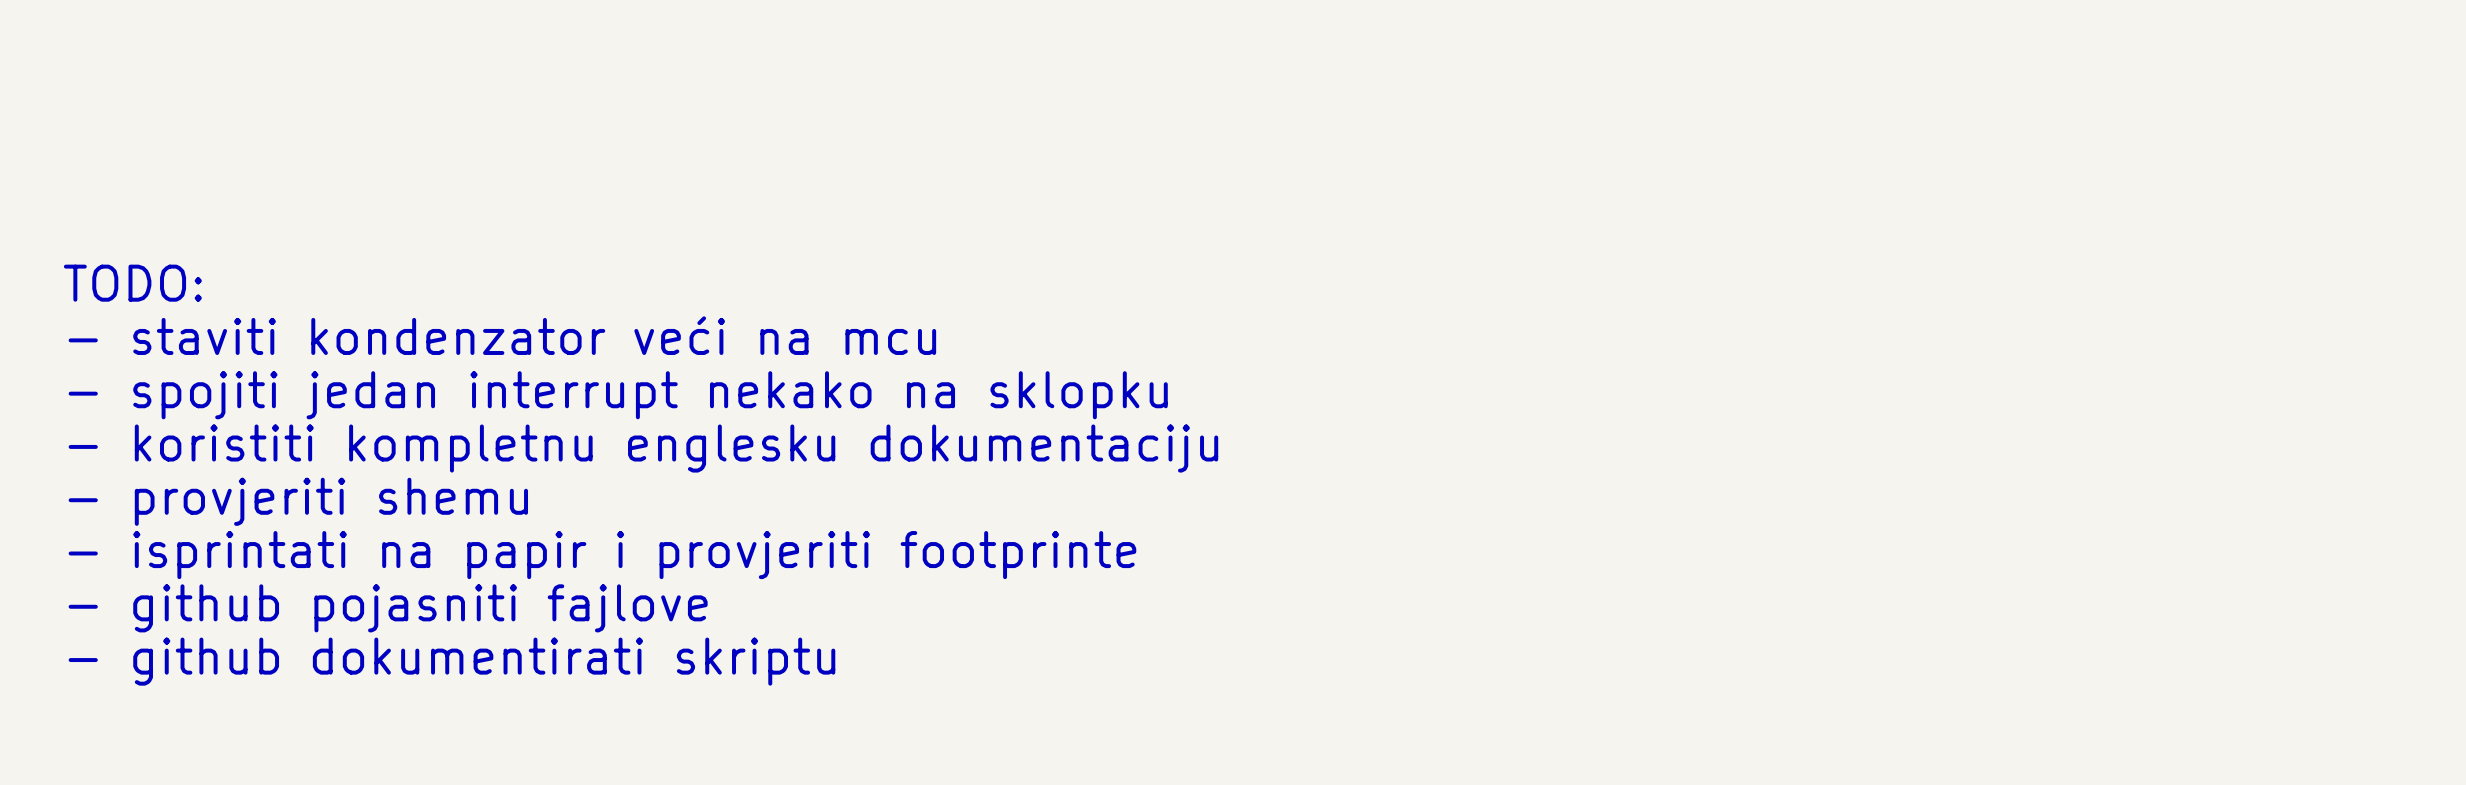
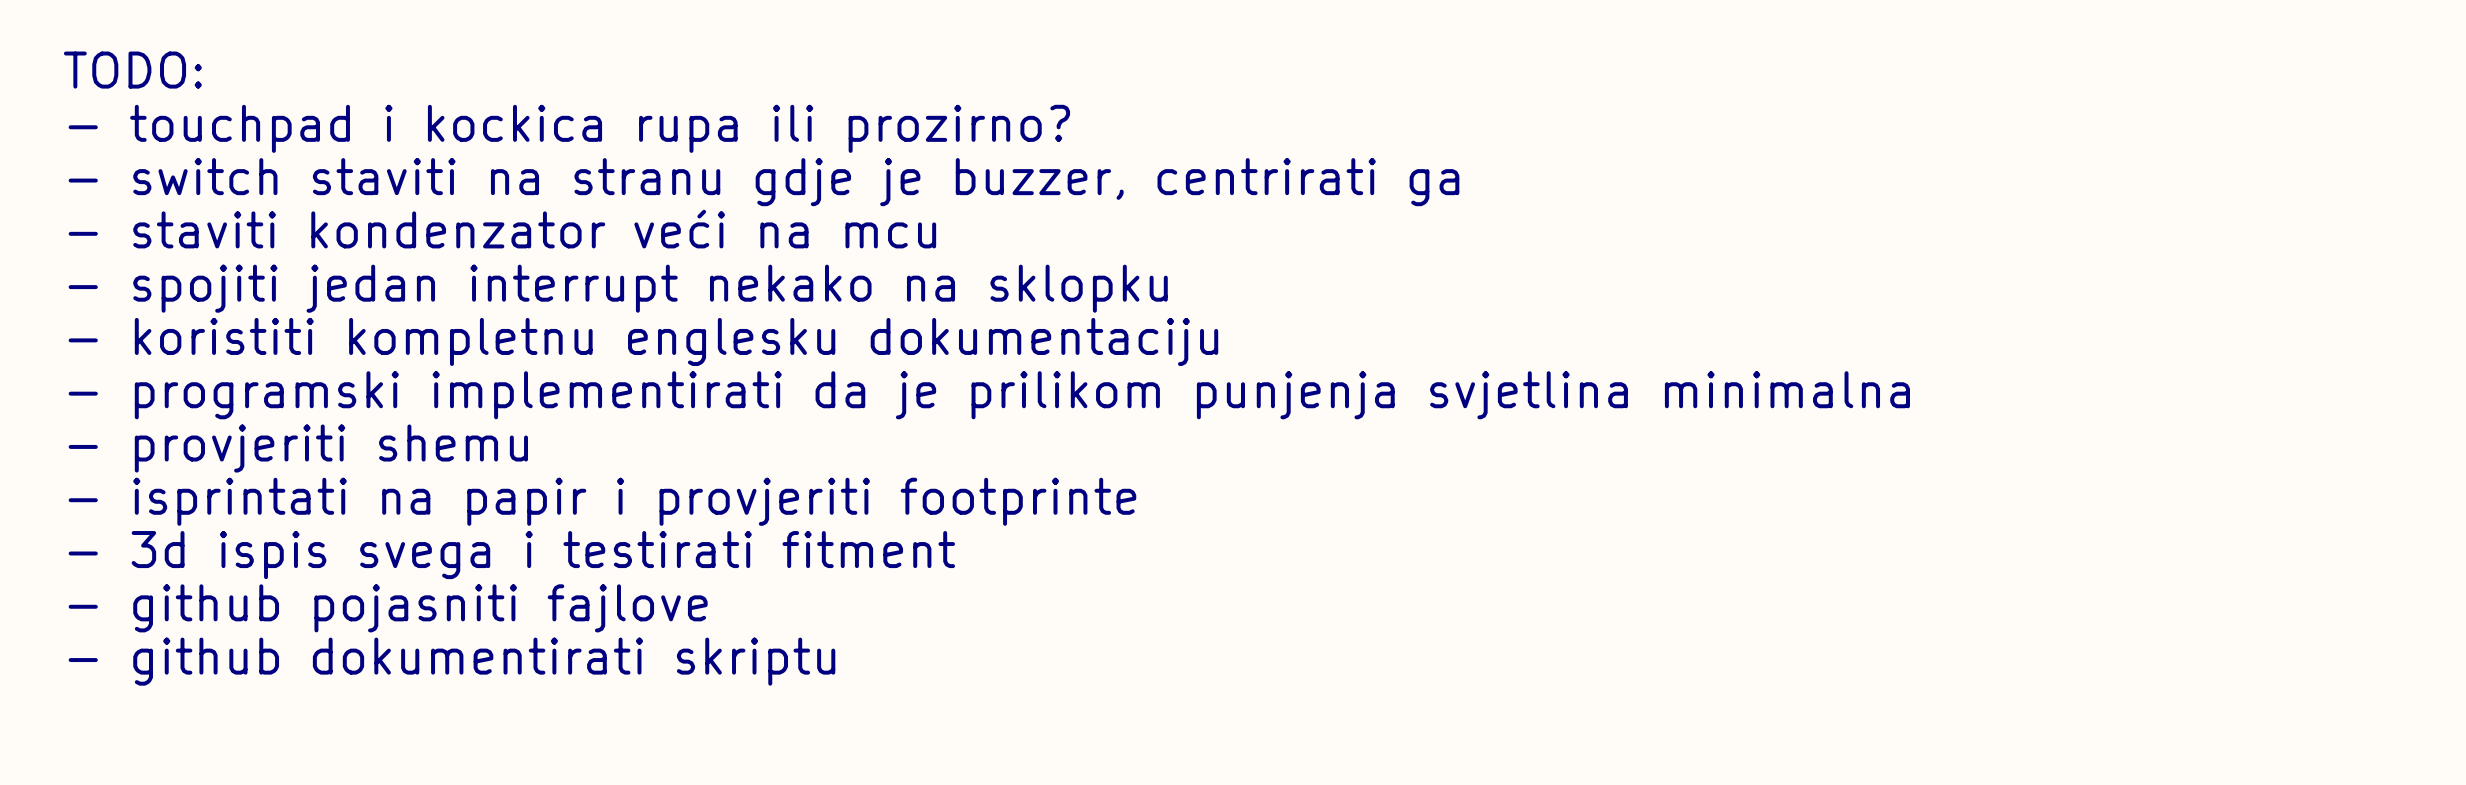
text: none -> TODO: (132, 70)
text: none -> - touchpad i kockica rupa ili prozirno? (569, 128)
text: none -> - switch staviti na stranu gdje je buzzer, centrirati ga (763, 182)
text: none -> - staviti kondenzator veći na mcu (502, 229)
text: TODO: (132, 283) -> - spojiti jedan interrupt nekako na sklopku (618, 288)
text: - staviti kondenzator veći na mcu (502, 335) -> - koristiti kompletnu englesku dokumentaciju (643, 341)
text: - spojiti jedan interrupt nekako na sklopku (618, 395) -> - programski implementirati da je prilikom punjenja svjetlina minimalna (989, 395)
text: - koristiti kompletnu englesku dokumentaciju (643, 448) -> - provjeriti shemu (298, 448)
text: - provjeriti shemu (298, 501) -> - isprintati na papir i provjeriti footprinte (602, 501)
text: - isprintati na papir i provjeriti footprinte (602, 555) -> - 3d ispis svega i testirati fitment (511, 555)

